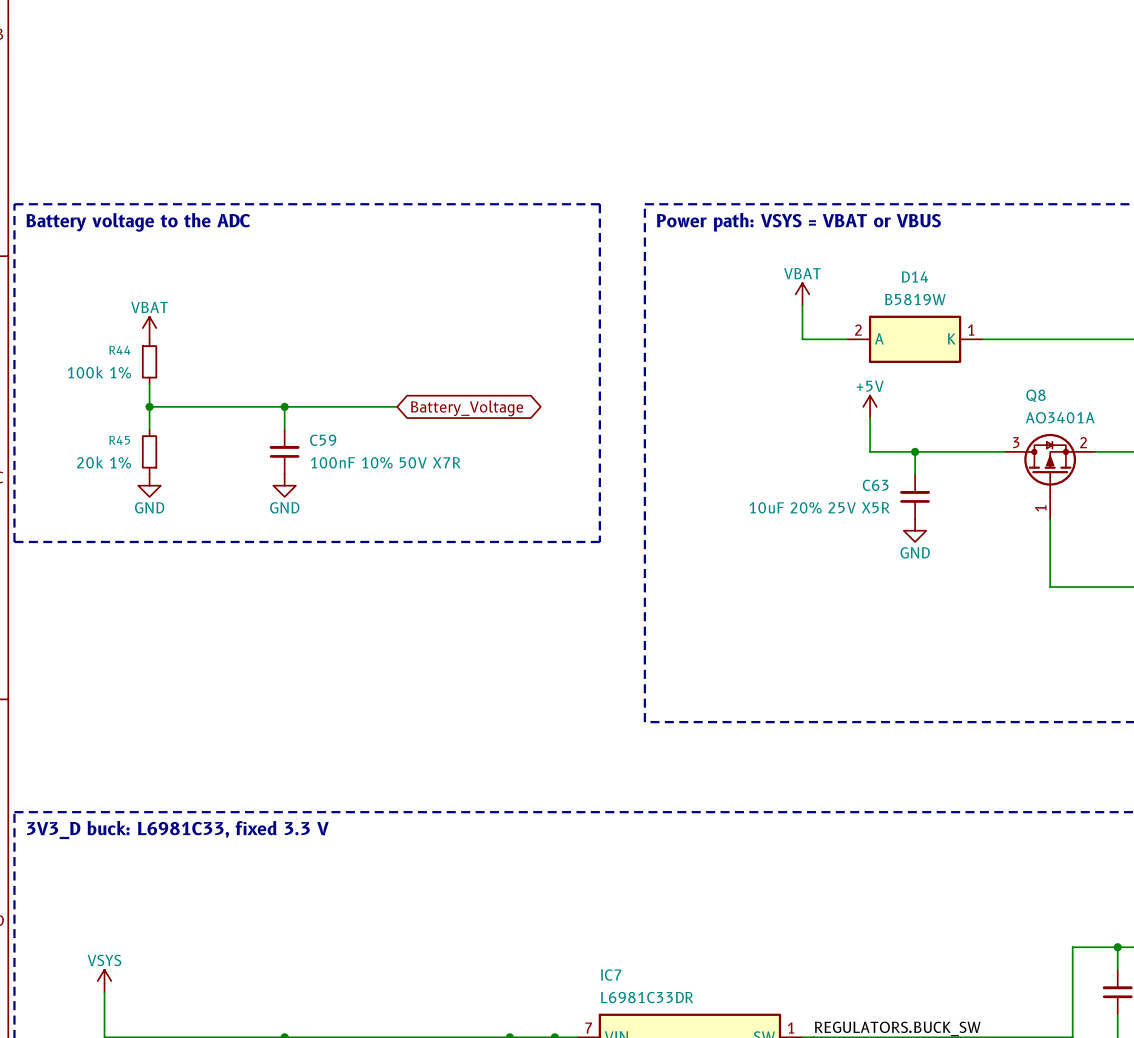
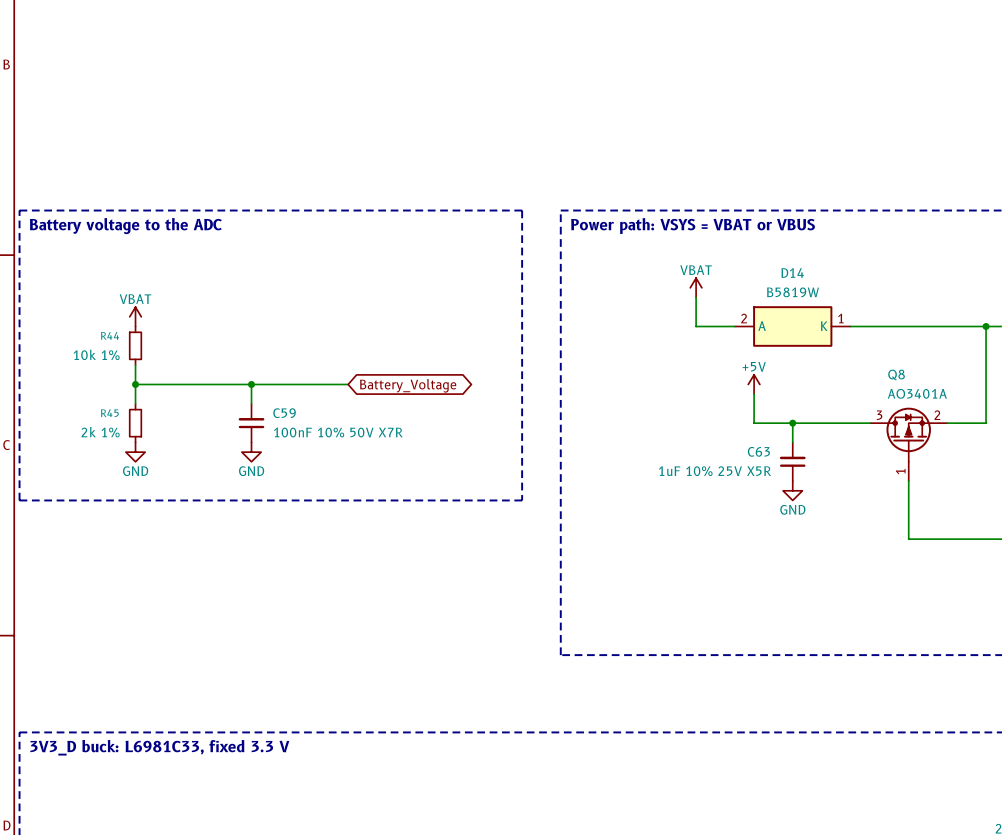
R44 value: 100k 1% (99, 372) -> 10k 1% (96, 354)
R45 value: 20k 1% (104, 462) -> 2k 1% (100, 432)
C63 value: 10uF 20% 25V X5R (819, 507) -> 1uF 10% 25V X5R (714, 471)

